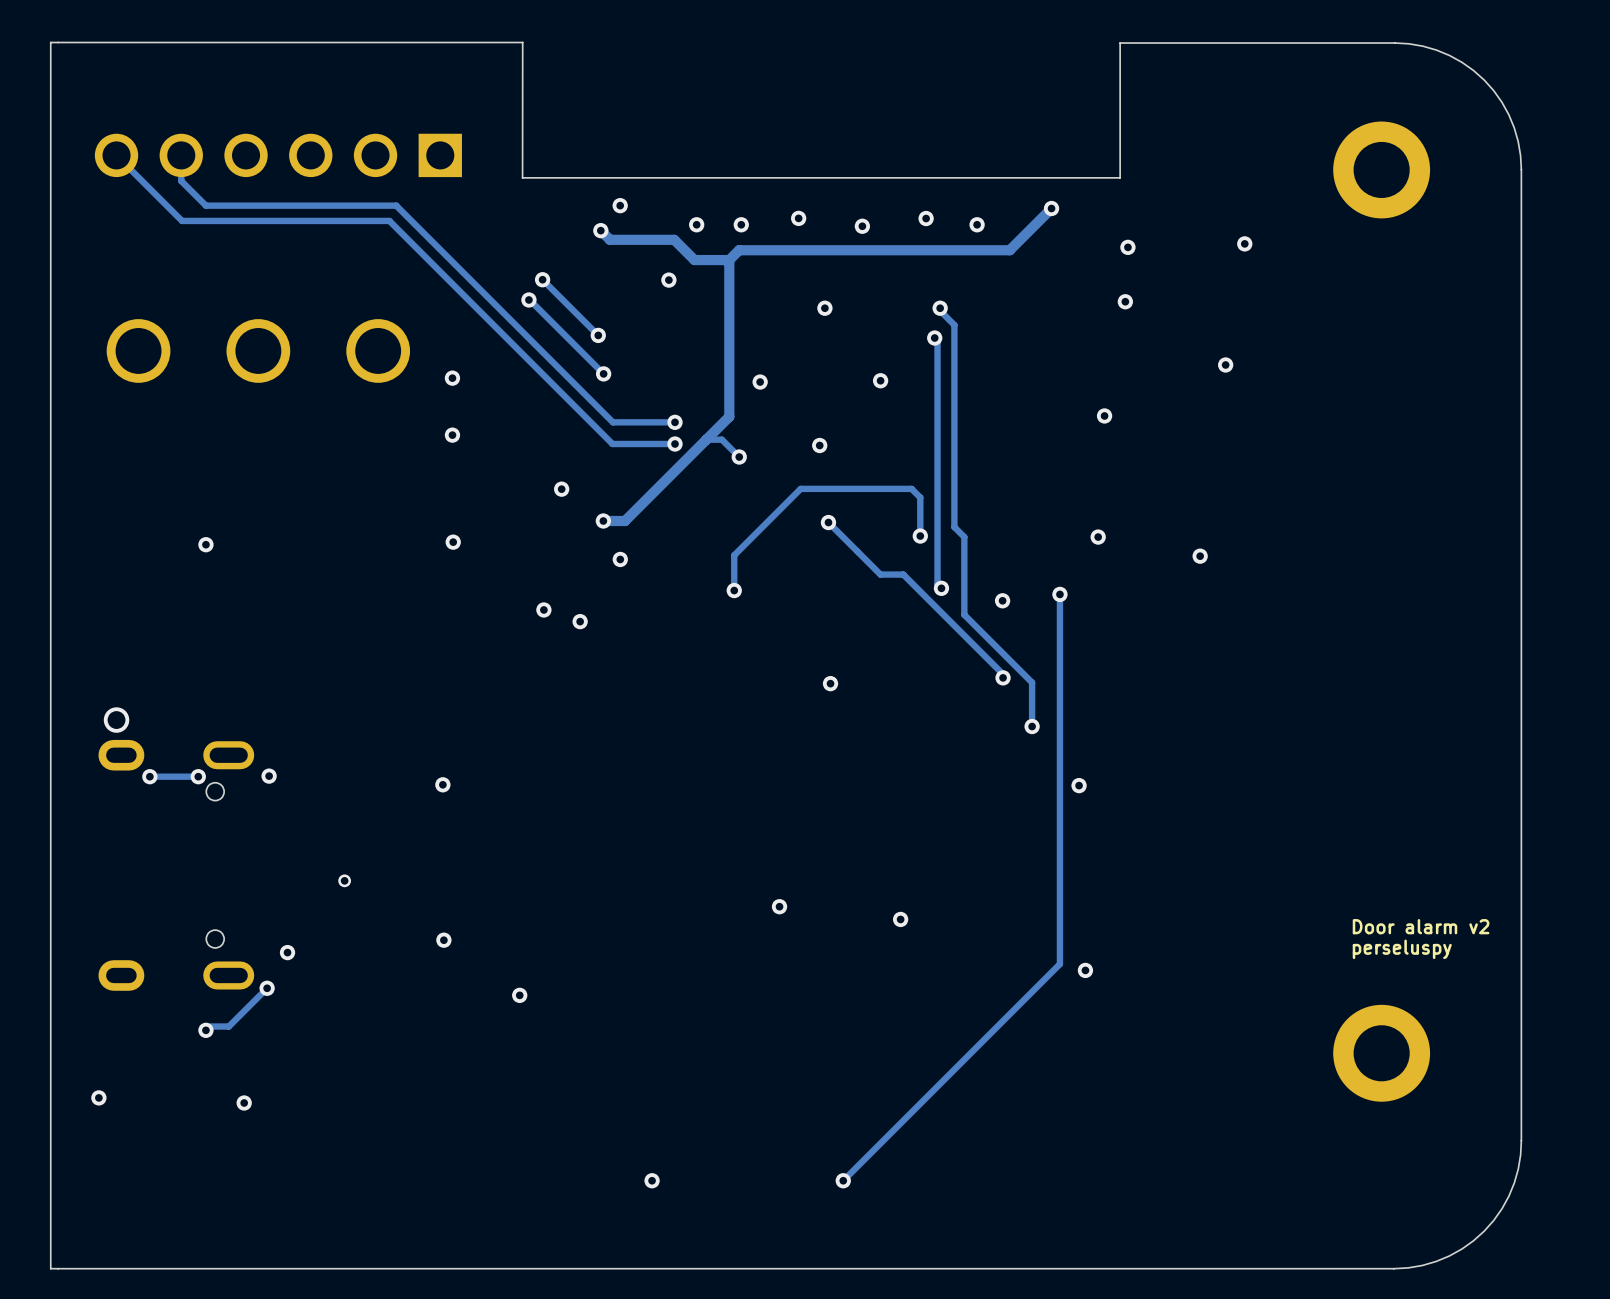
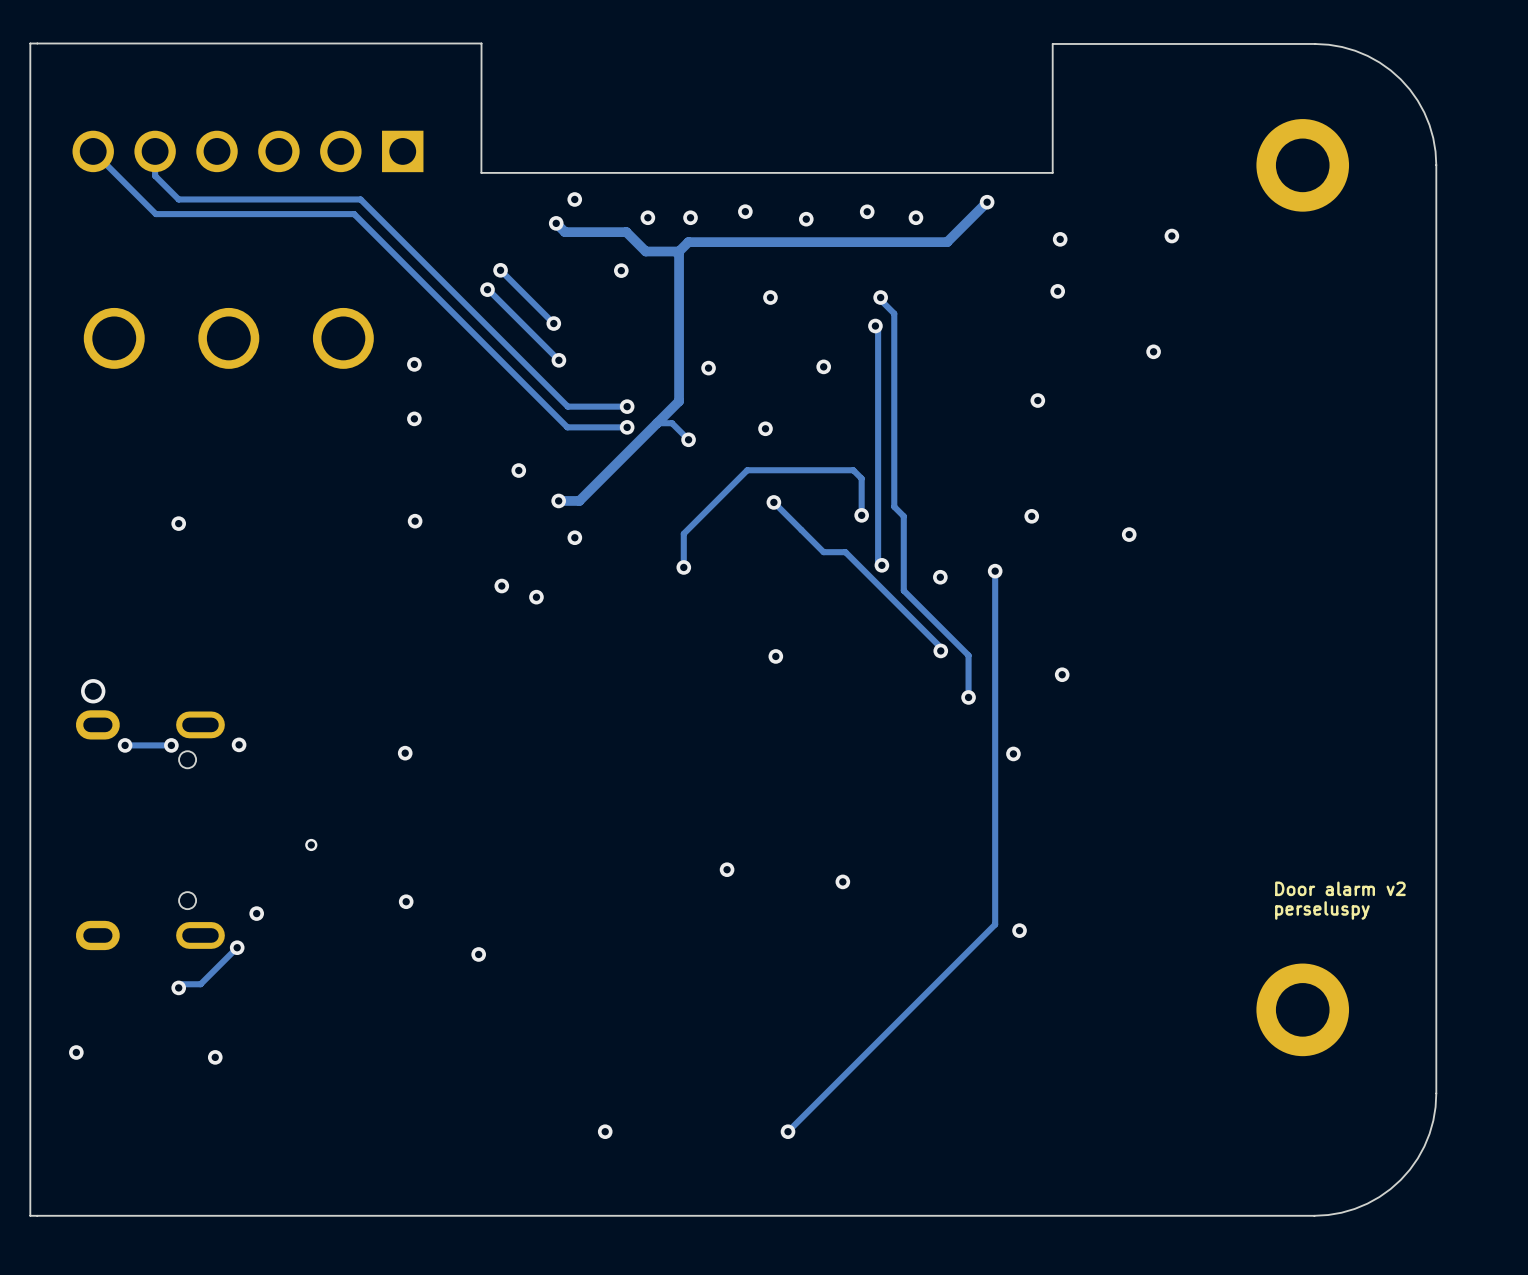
via: none -> (1062, 674)

